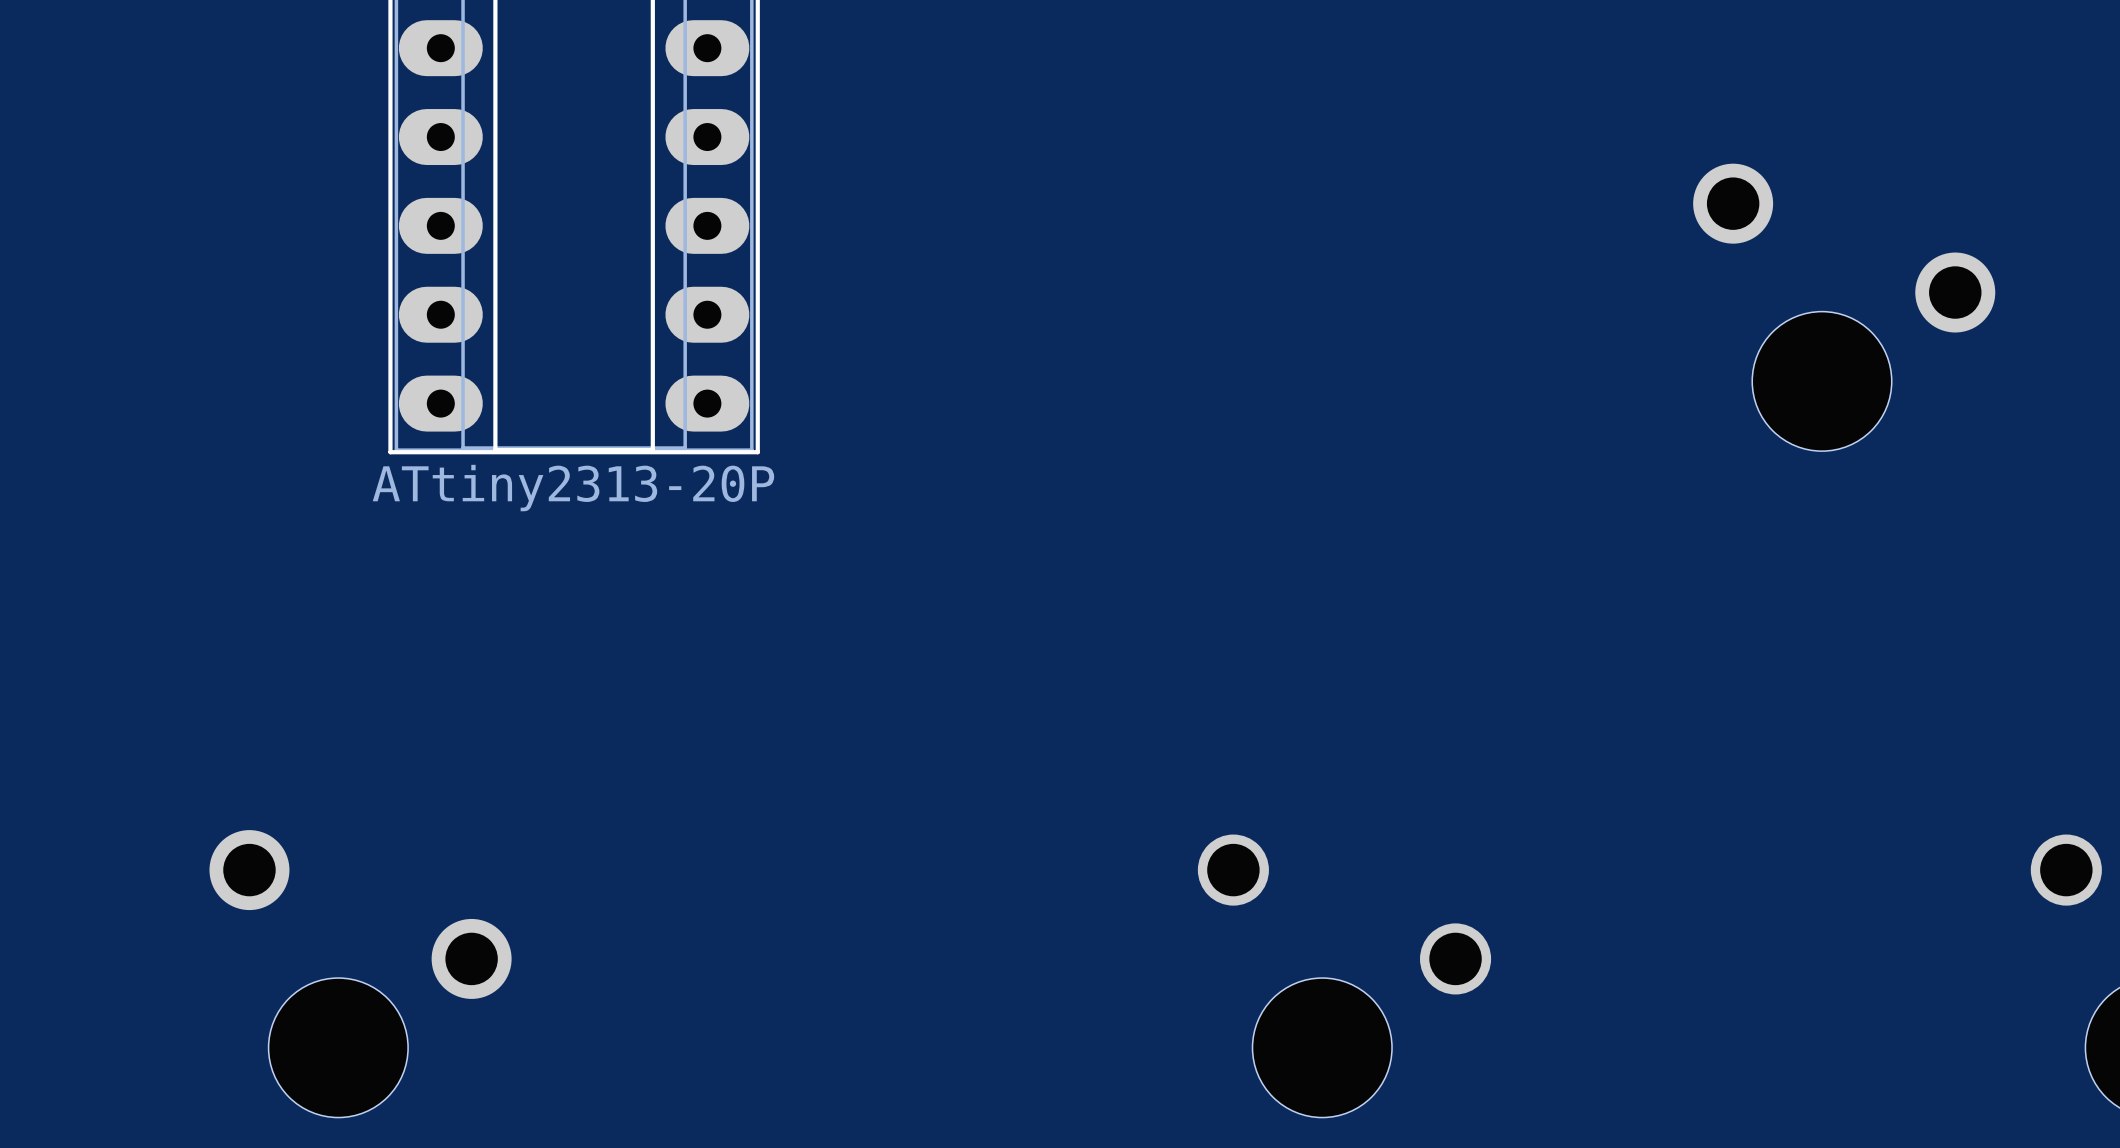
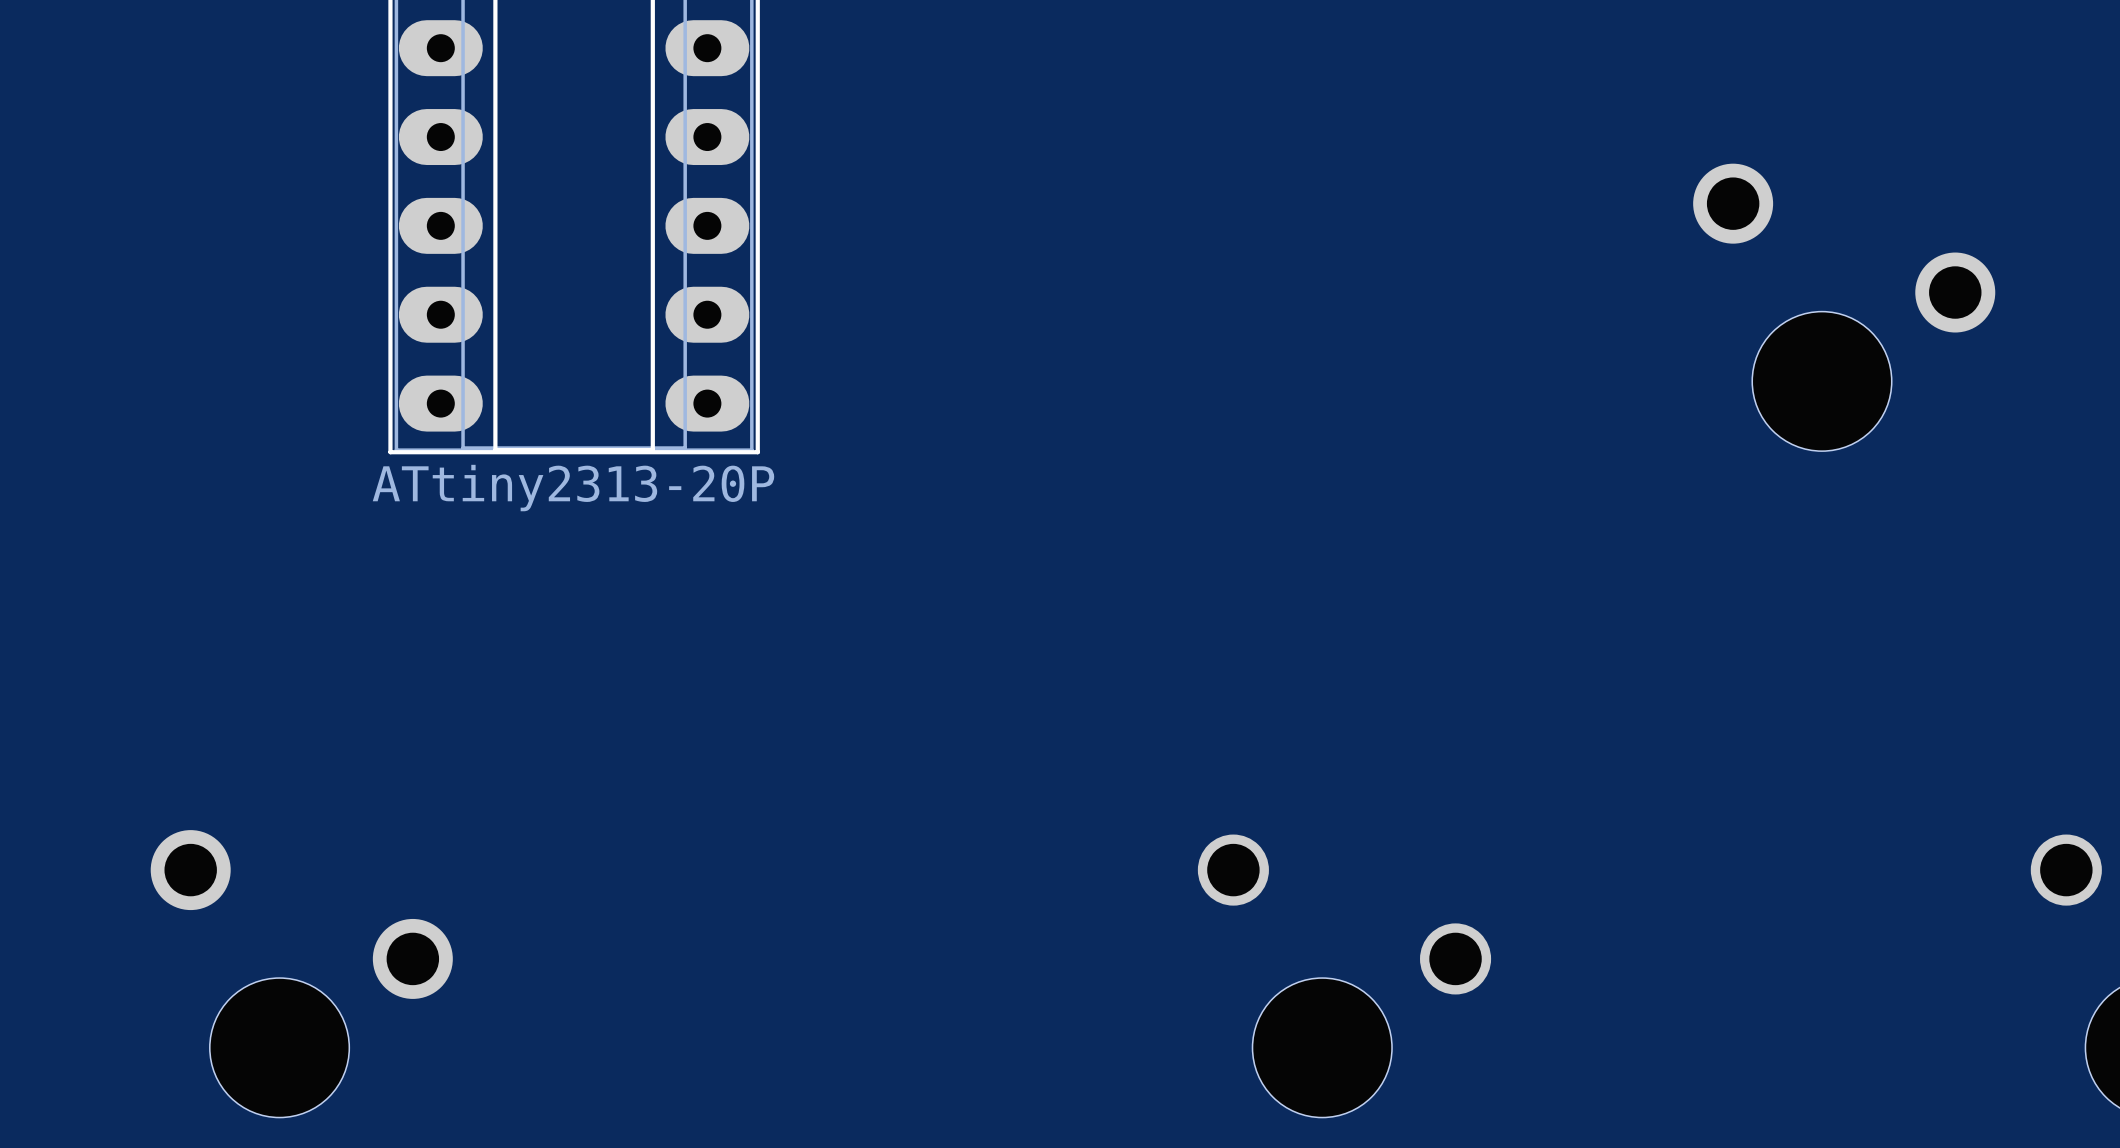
part position: (360, 973) -> (301, 973)

